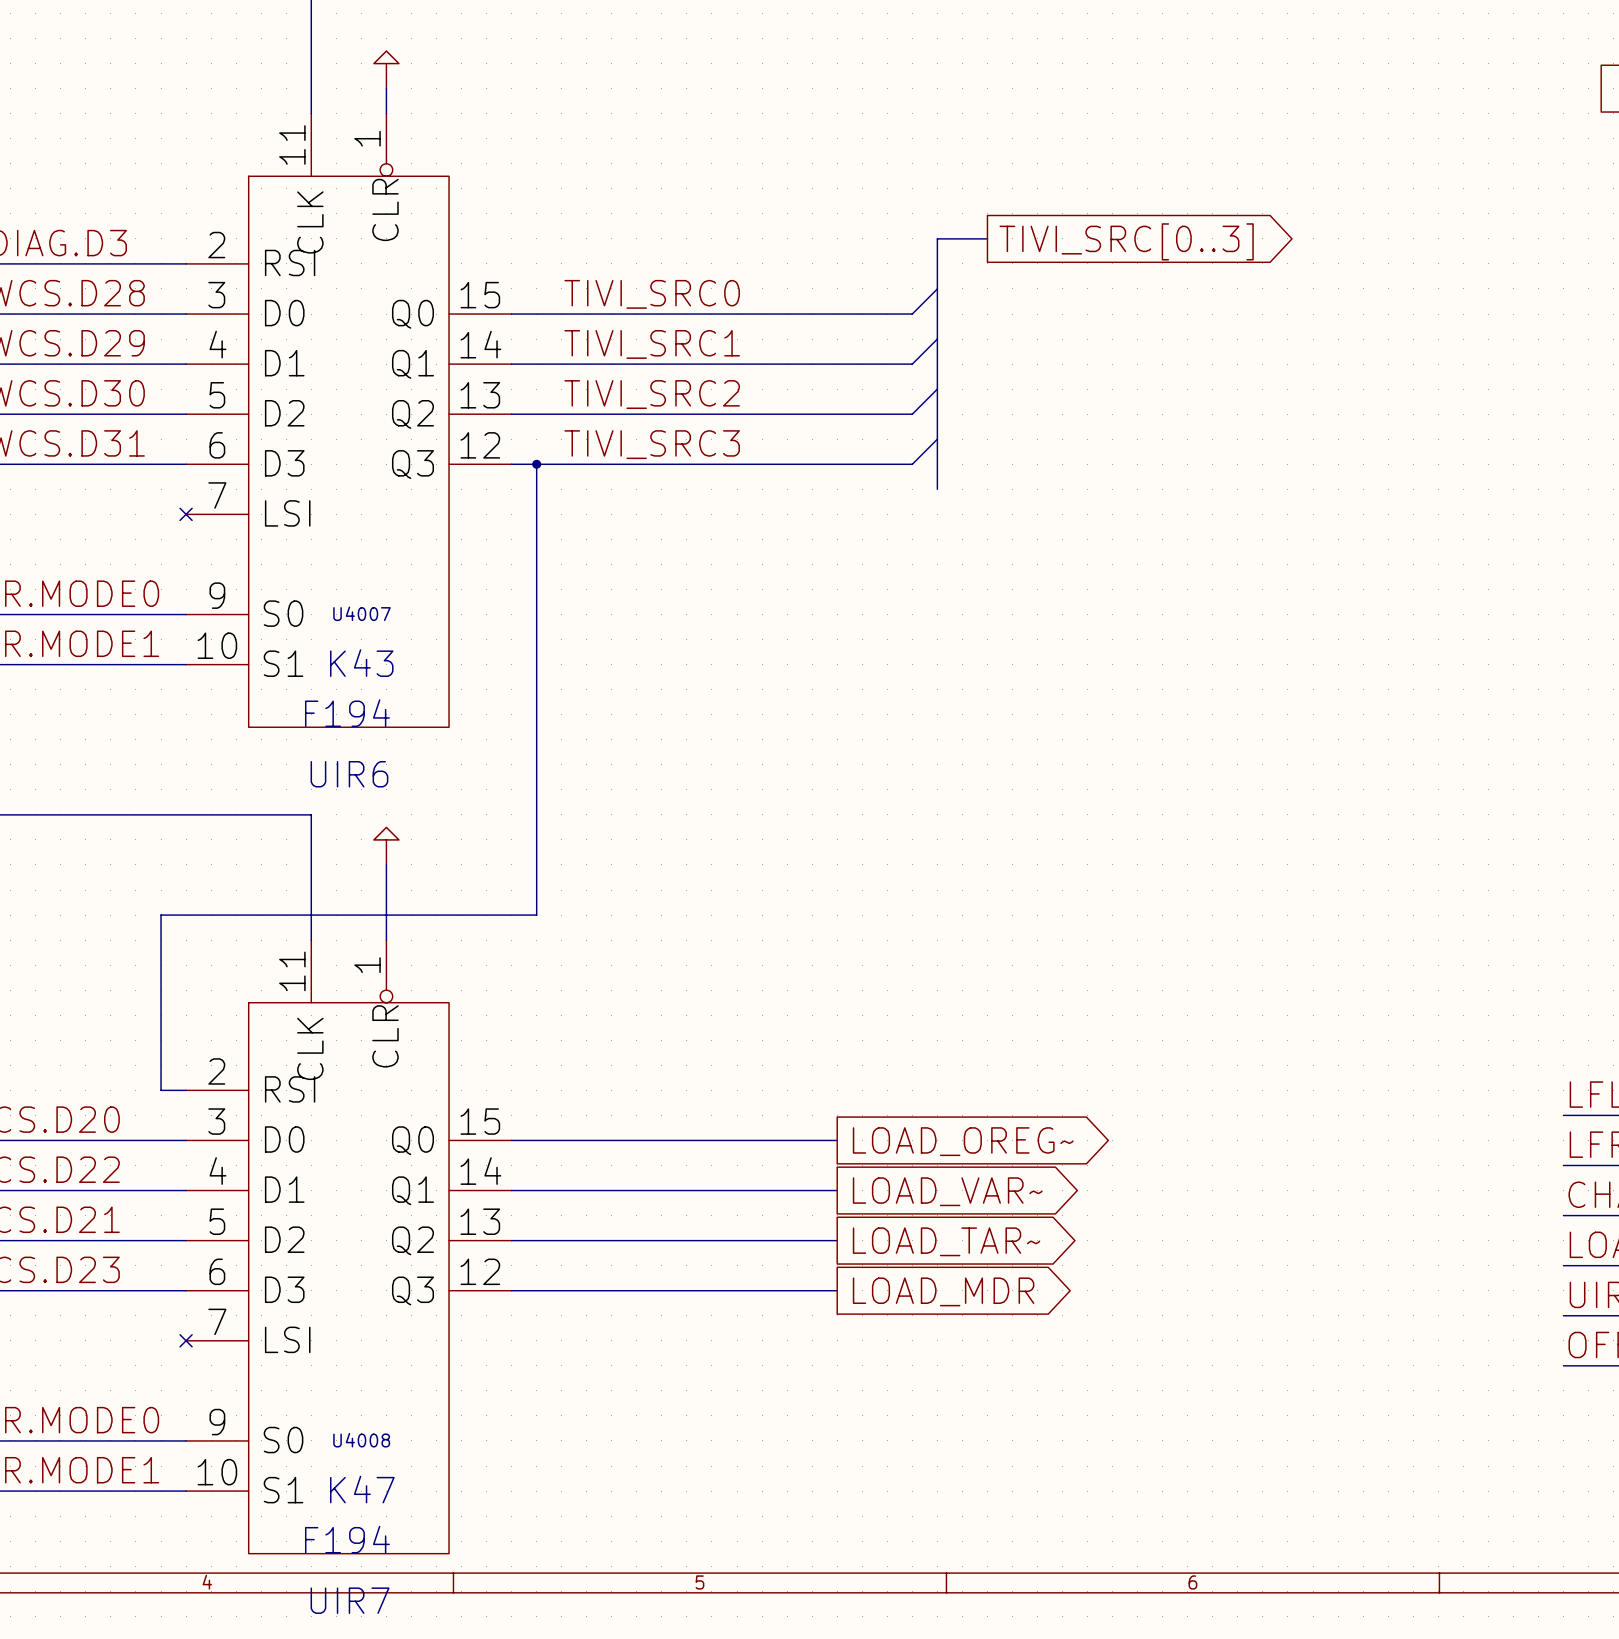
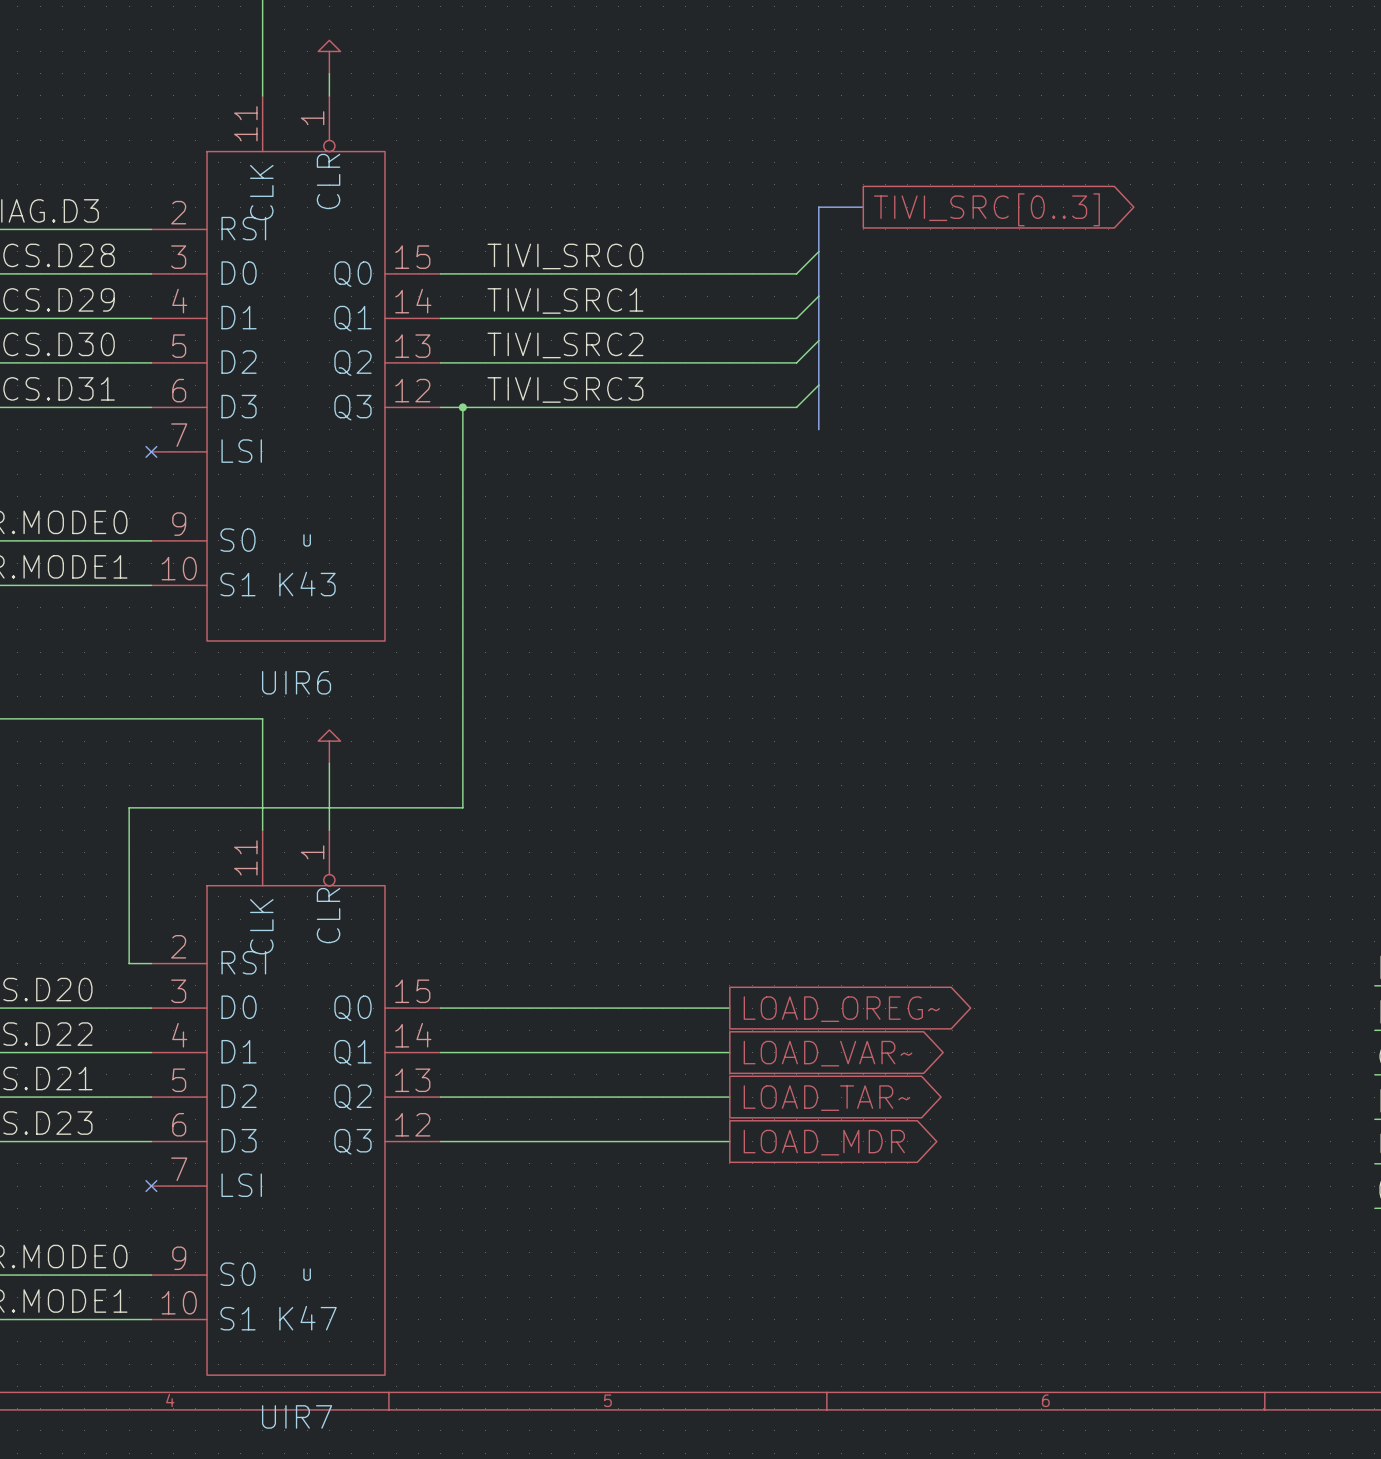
U4007 name: U4007 (361, 613) -> U (307, 540)
U4007 value: F194 (347, 713) -> none
U4008 name: U4008 (361, 1440) -> U (307, 1274)
U4008 value: F194 (347, 1539) -> none

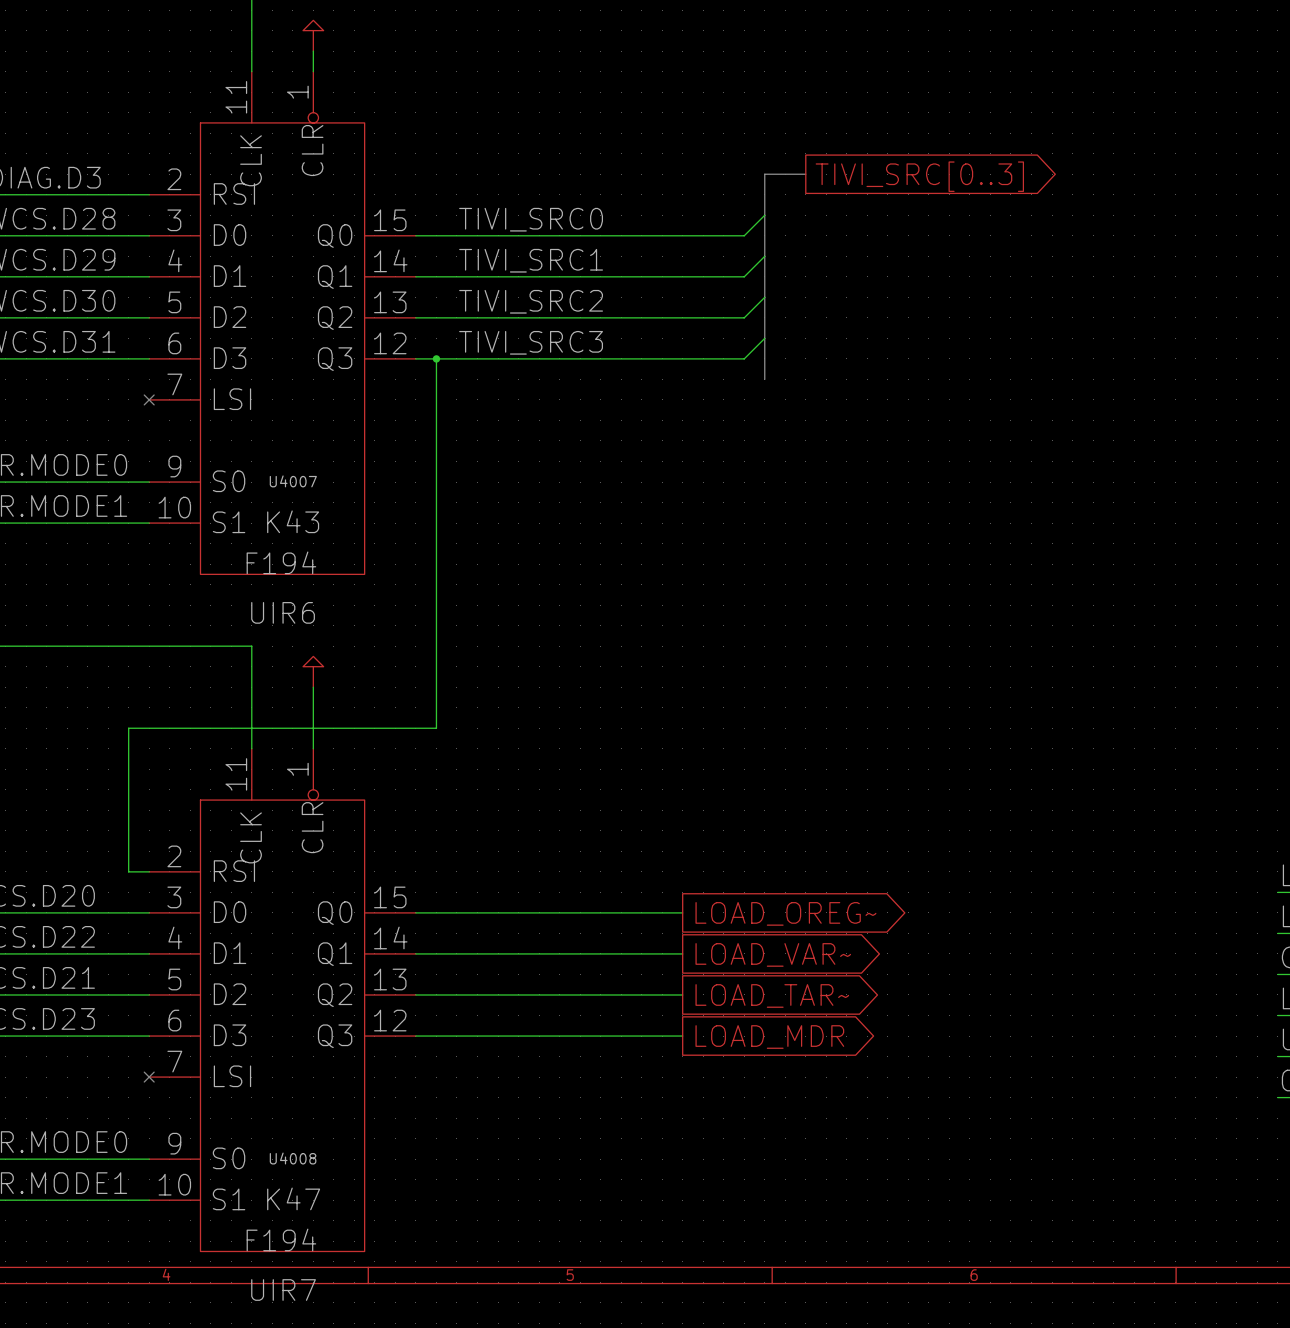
U name: U (307, 540) -> U4007 (293, 481)
U value: none -> F194 (281, 562)
U name: U (307, 1274) -> U4008 (293, 1158)
U value: none -> F194 (281, 1239)

